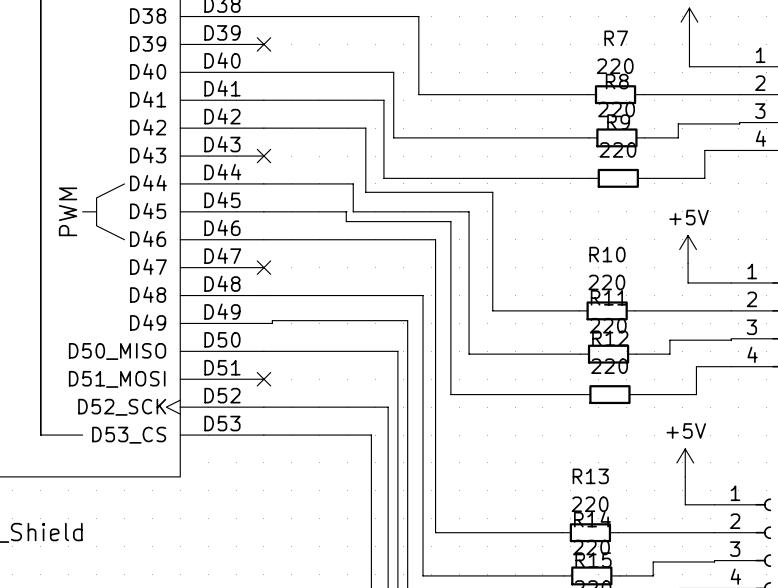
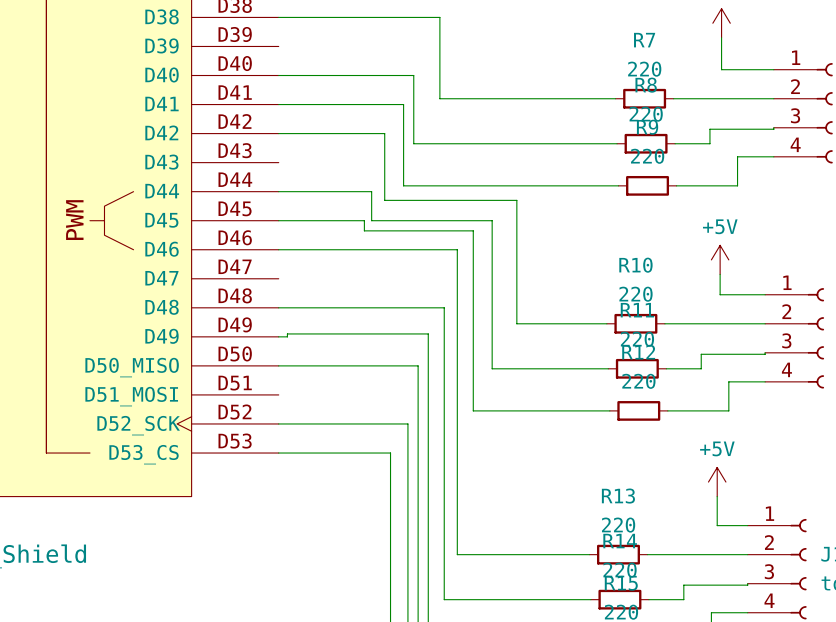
no-connect mark: (263, 44) -> none
no-connect mark: (263, 156) -> none
no-connect mark: (263, 267) -> none
no-connect mark: (263, 379) -> none

